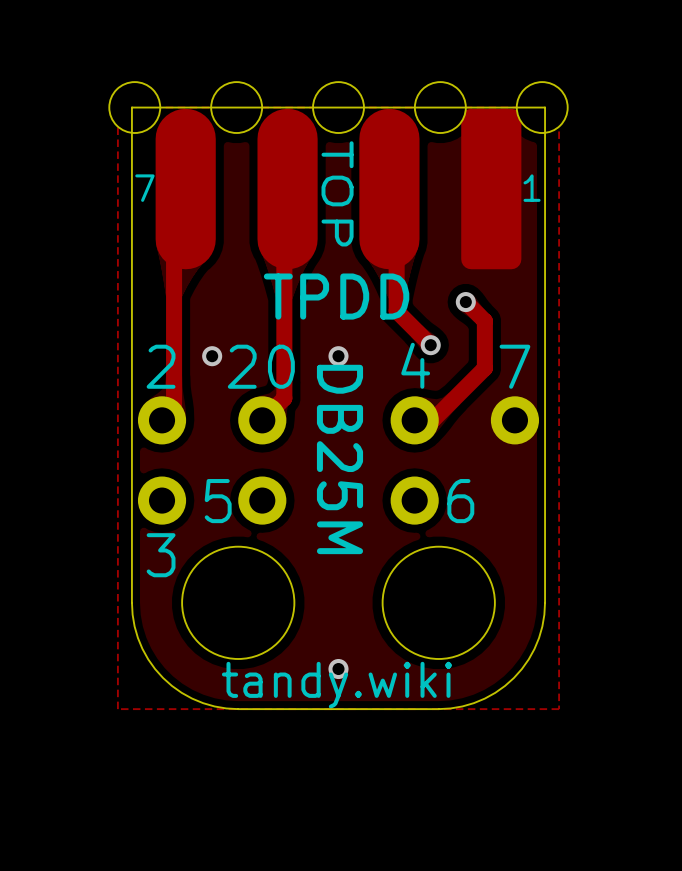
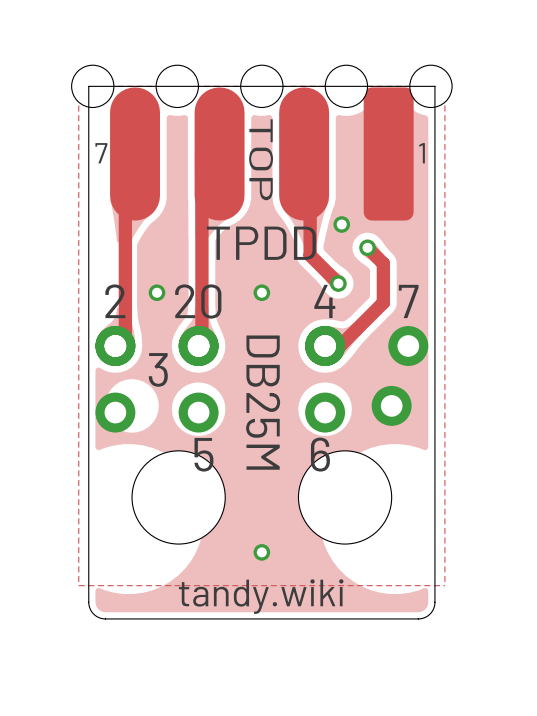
board edge: (131, 107) (131, 602) (134, 626) (148, 659) (171, 685) (203, 703) (238, 709) (438, 709) (462, 706) (484, 698) (505, 685) (521, 669) (534, 648) (542, 626) (545, 602) (545, 107) -> (90, 86) (88, 86) (88, 602) (93, 614) (105, 618) (418, 618) (426, 616) (432, 610) (434, 602) (434, 86) (433, 86)
track: (284, 192) (284, 398) (266, 416) -> (216, 156) (201, 171) (201, 342)
via: none -> (341, 224)
part: none -> (115, 345)
part: none -> (198, 345)
part: none -> (325, 345)
text position: DB25M (339, 459) -> DB25M (263, 402)
part: none -> (391, 405)
text position: 5 (218, 501) -> 5 (203, 454)
text position: 6 (460, 501) -> 6 (320, 454)
text position: 3 (161, 555) -> 3 (158, 369)
text position: tandy.wiki (336, 685) -> tandy.wiki (261, 596)

